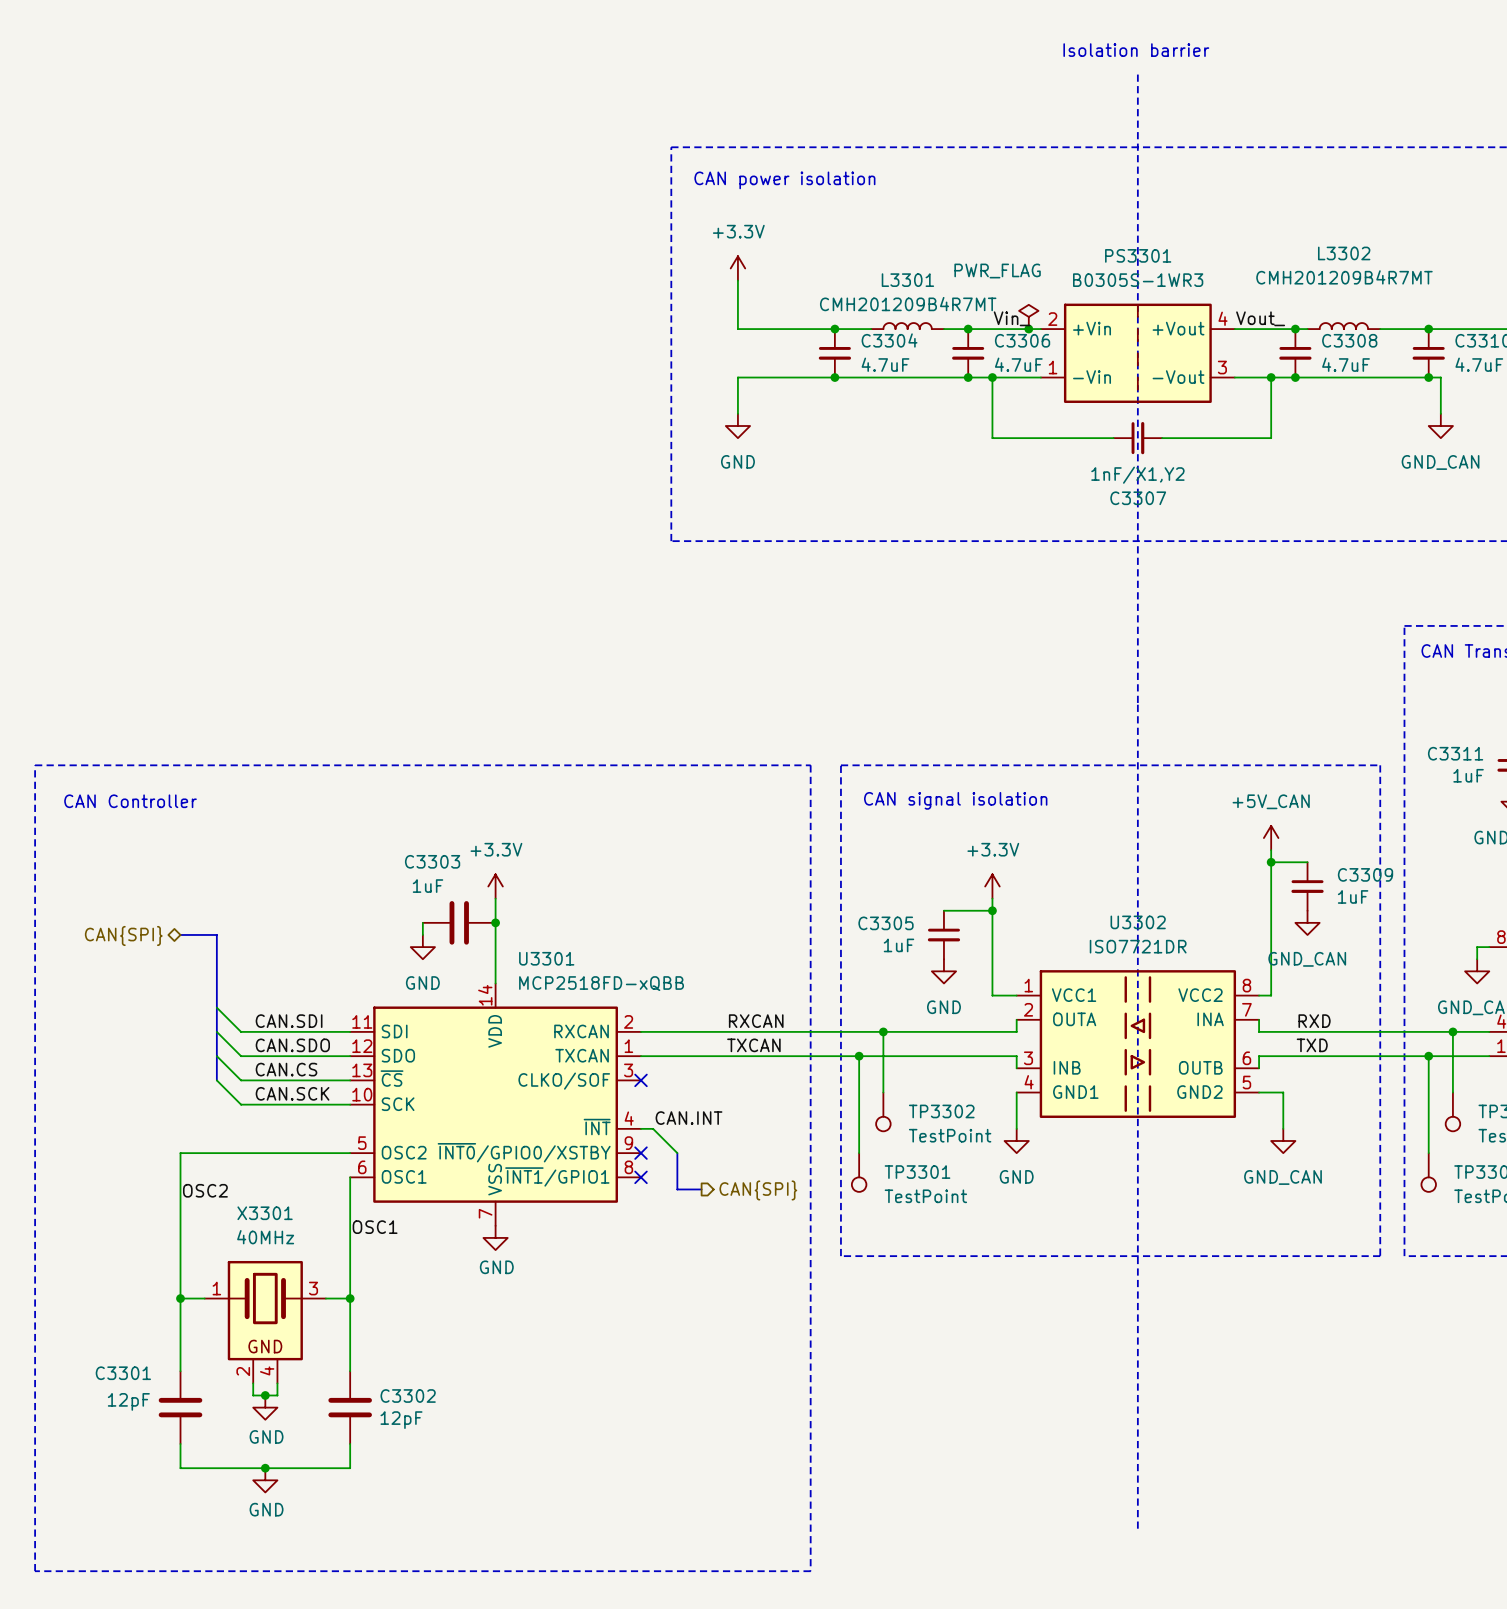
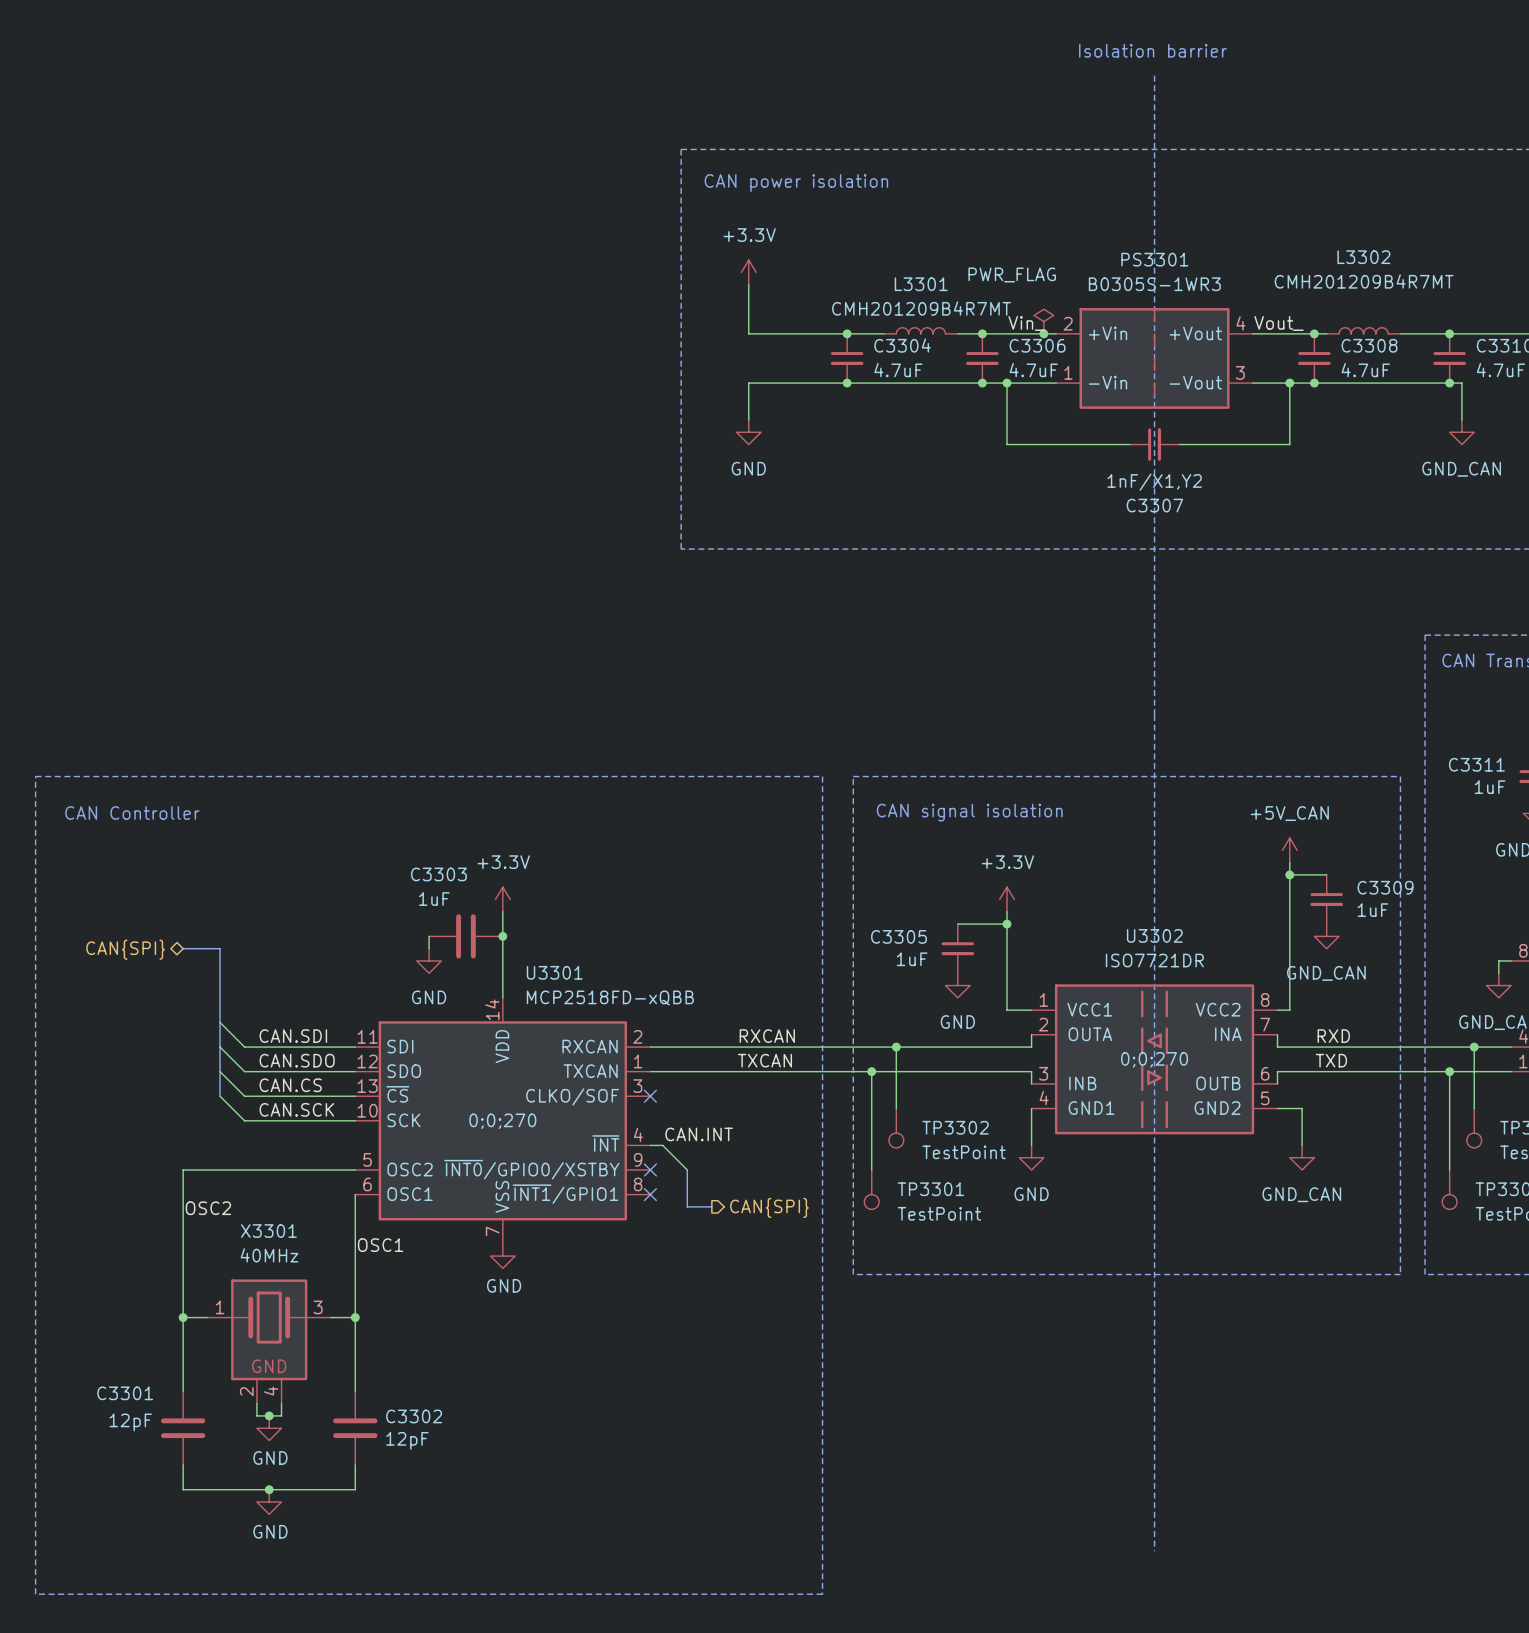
U3302 text: none -> 0;0;270 (1154, 1059)
U3301 text: none -> 0;0;270 (502, 1121)

